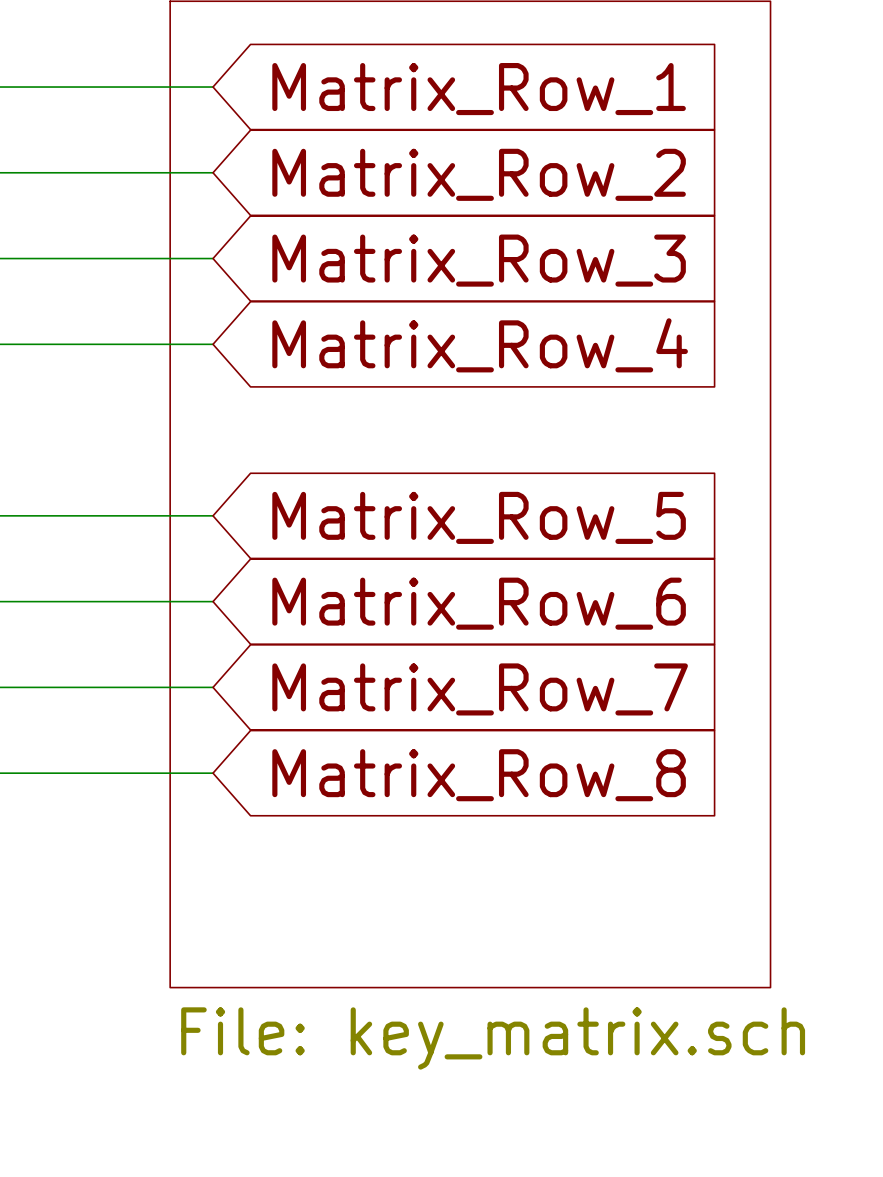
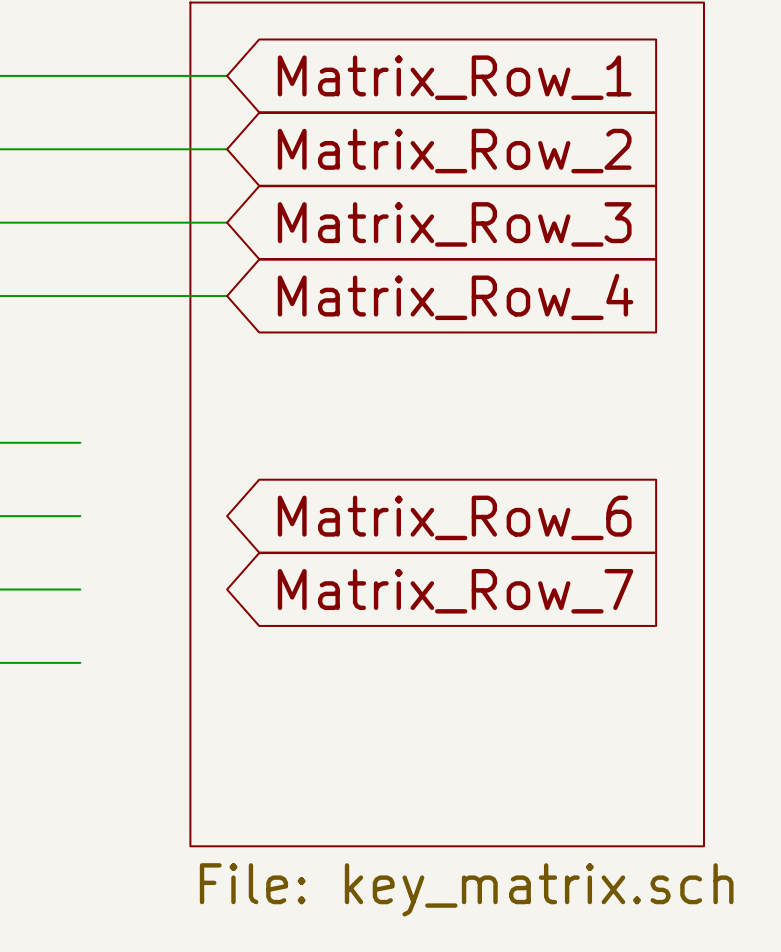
wire: (41, 515) (213, 515) -> none
global label: Matrix_Row_5 (479, 517) -> none
wire: (41, 601) (213, 601) -> none
wire: (41, 687) (213, 687) -> none
wire: (41, 773) (213, 773) -> none
global label: Matrix_Row_8 (479, 775) -> none

